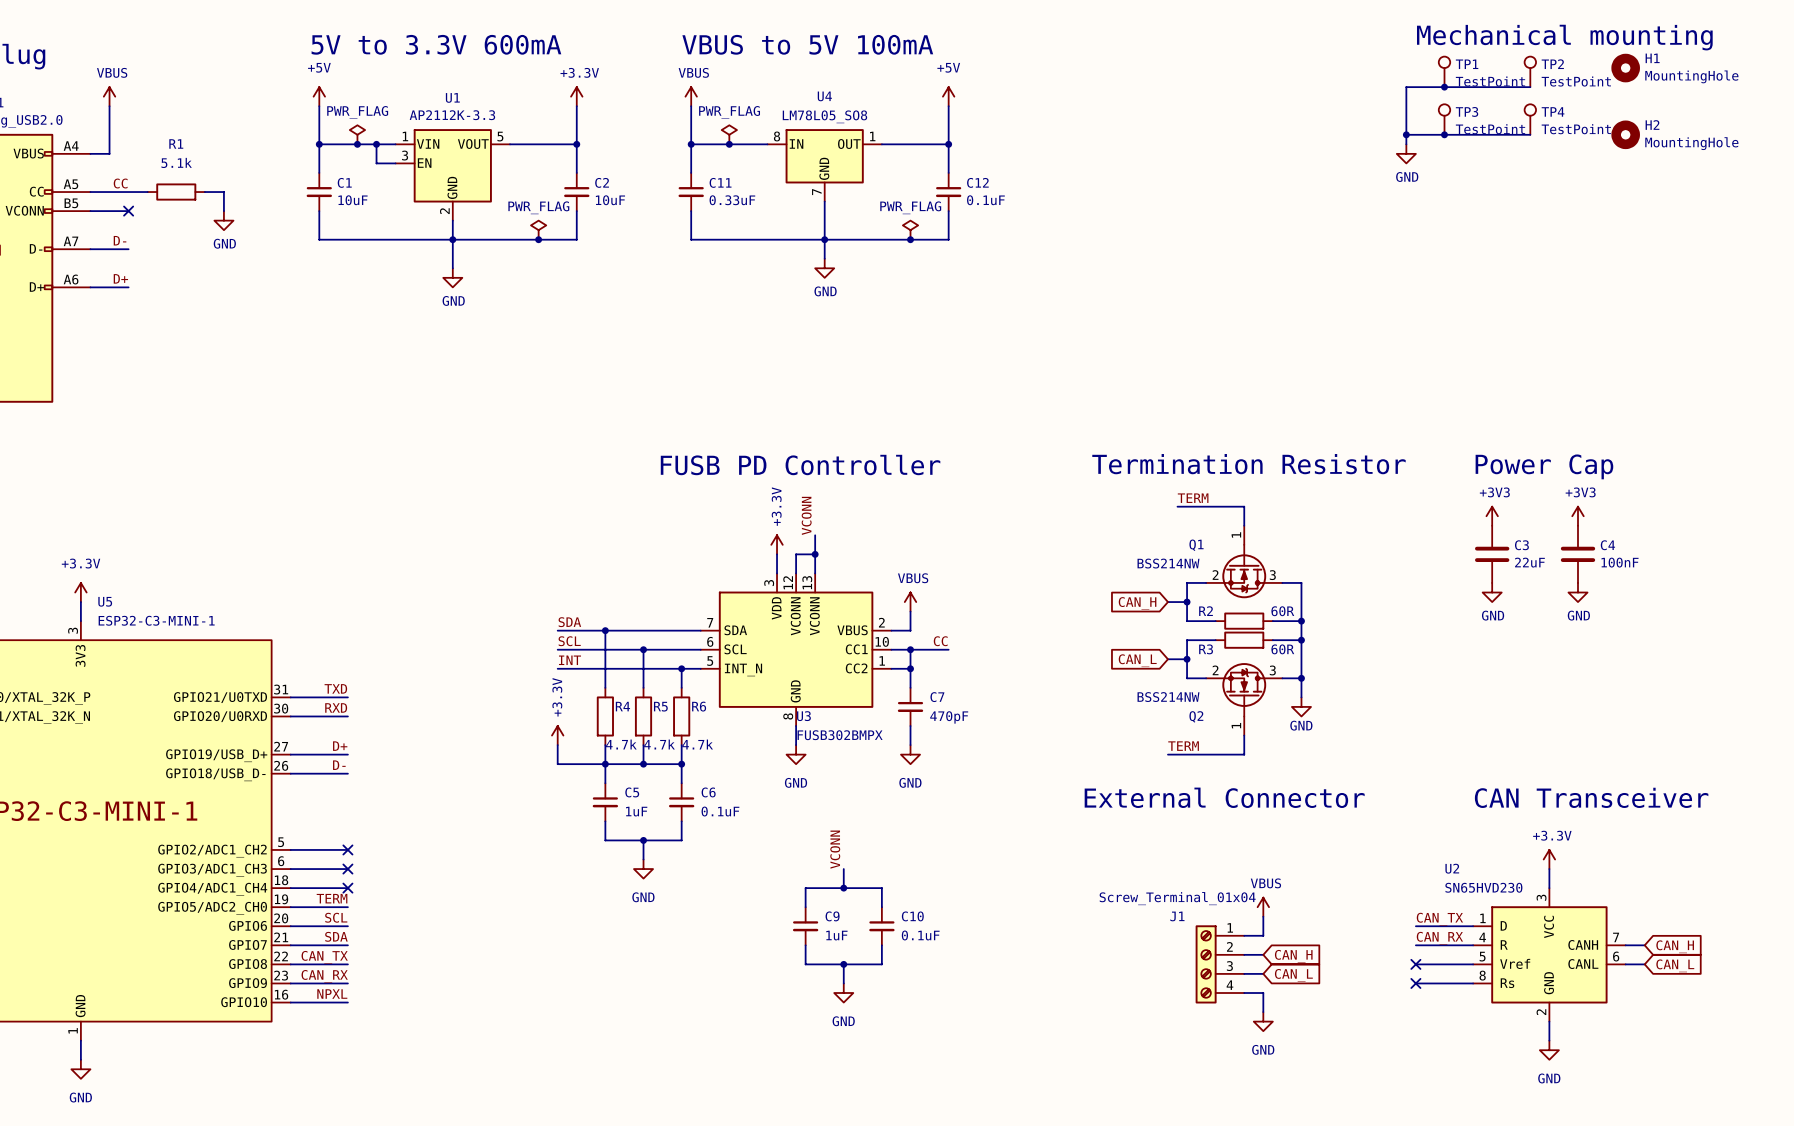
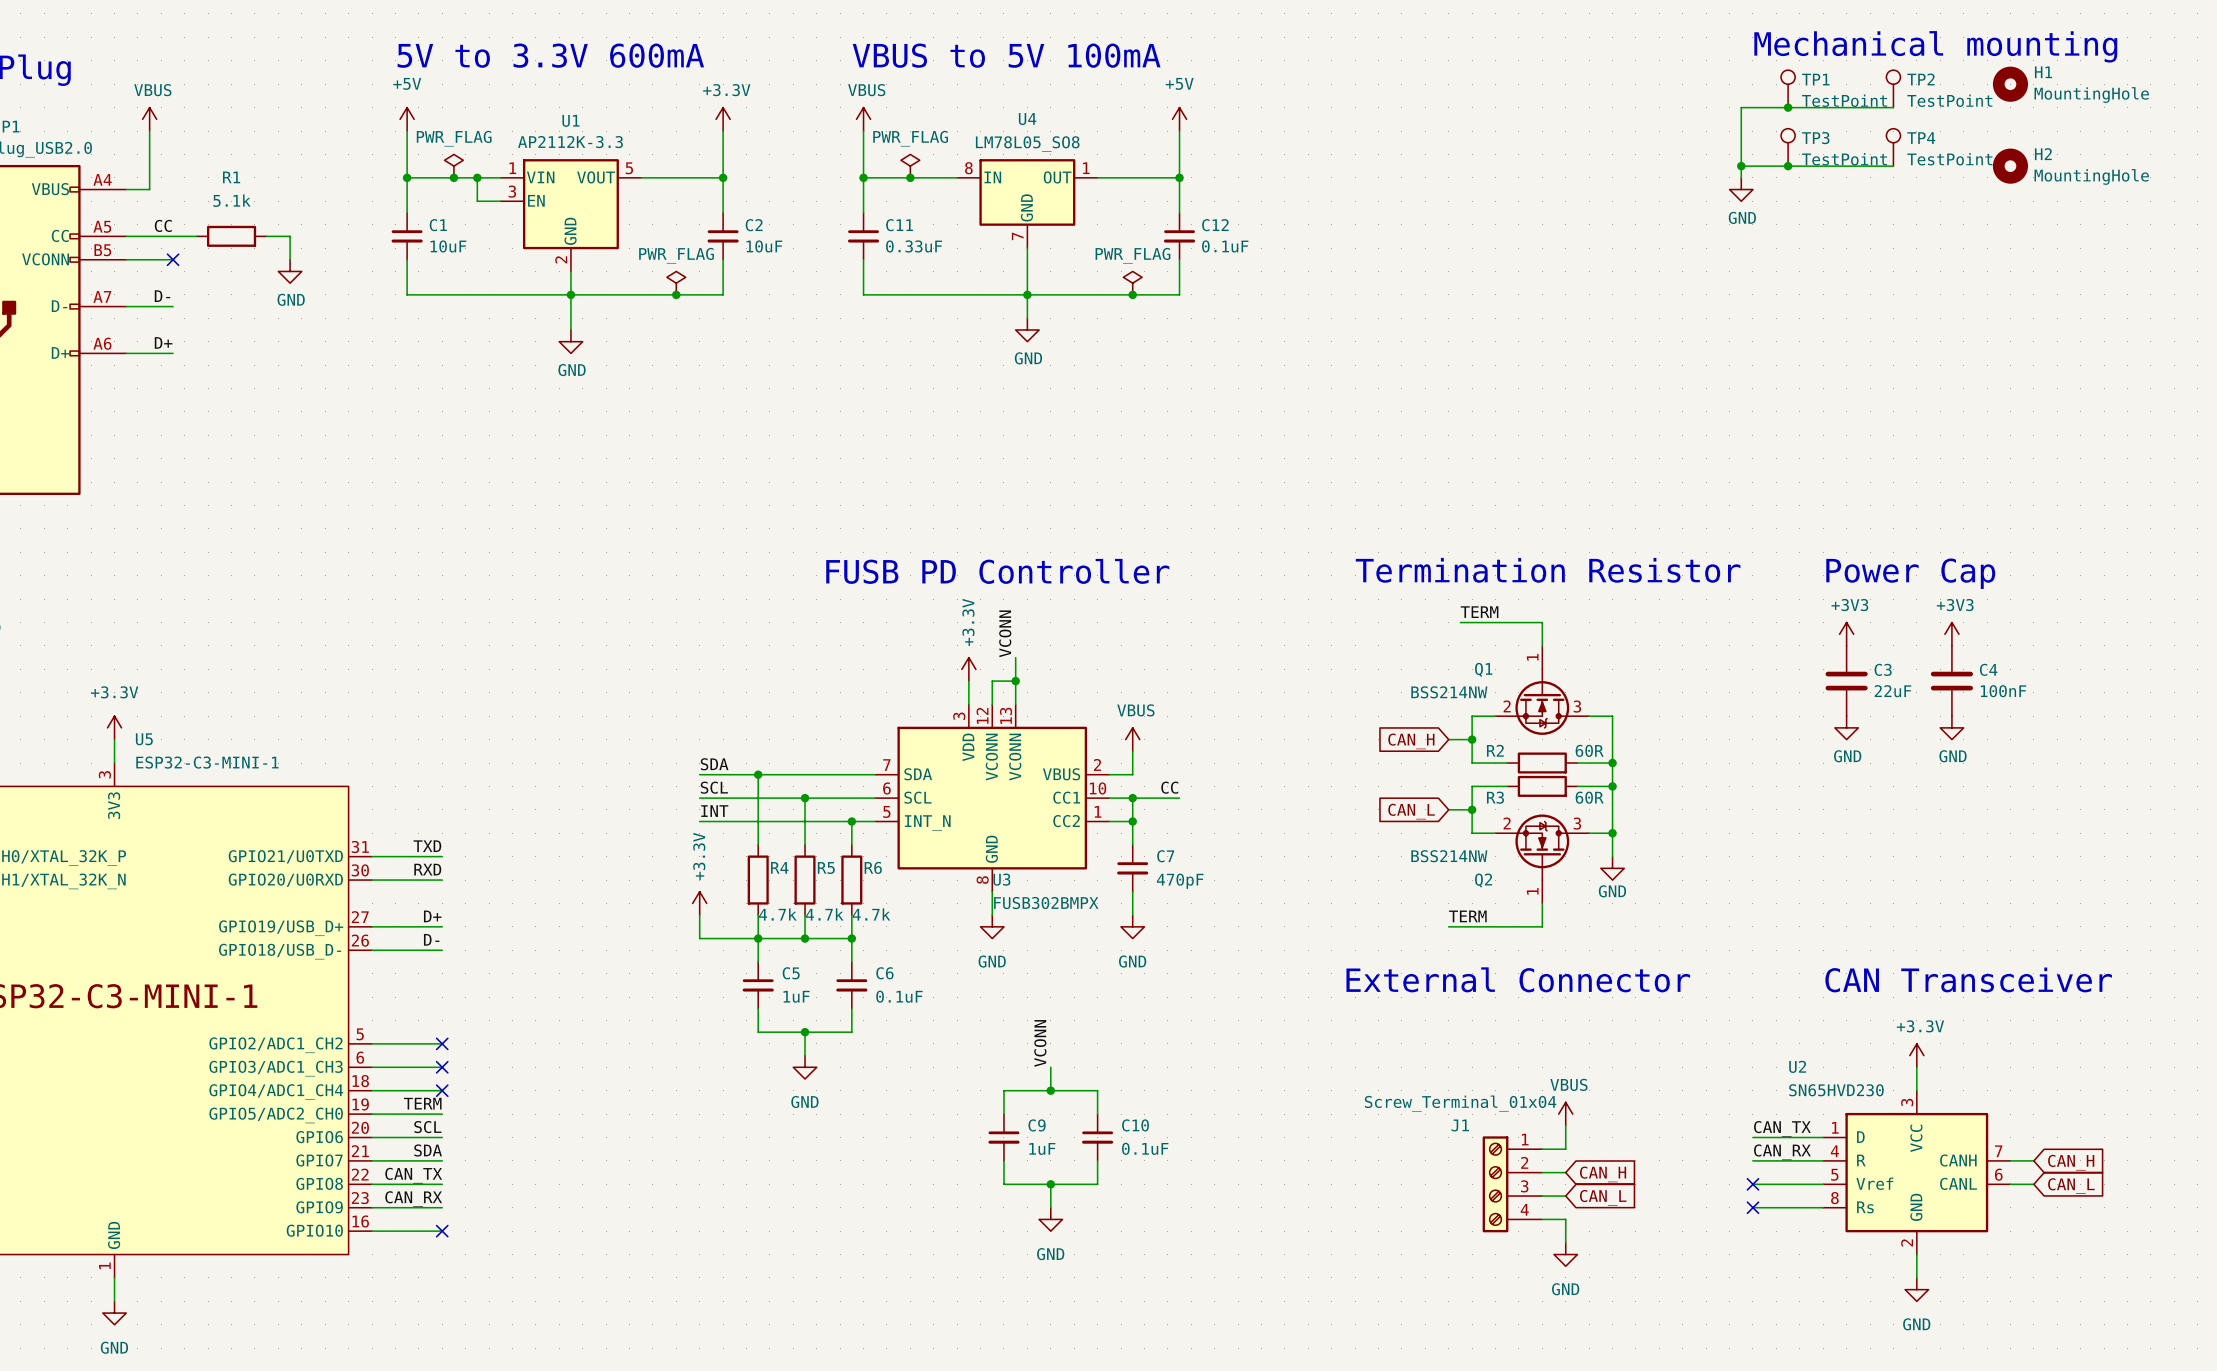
label: NPXL (332, 994) -> none
no-connect mark: none -> (442, 1231)

